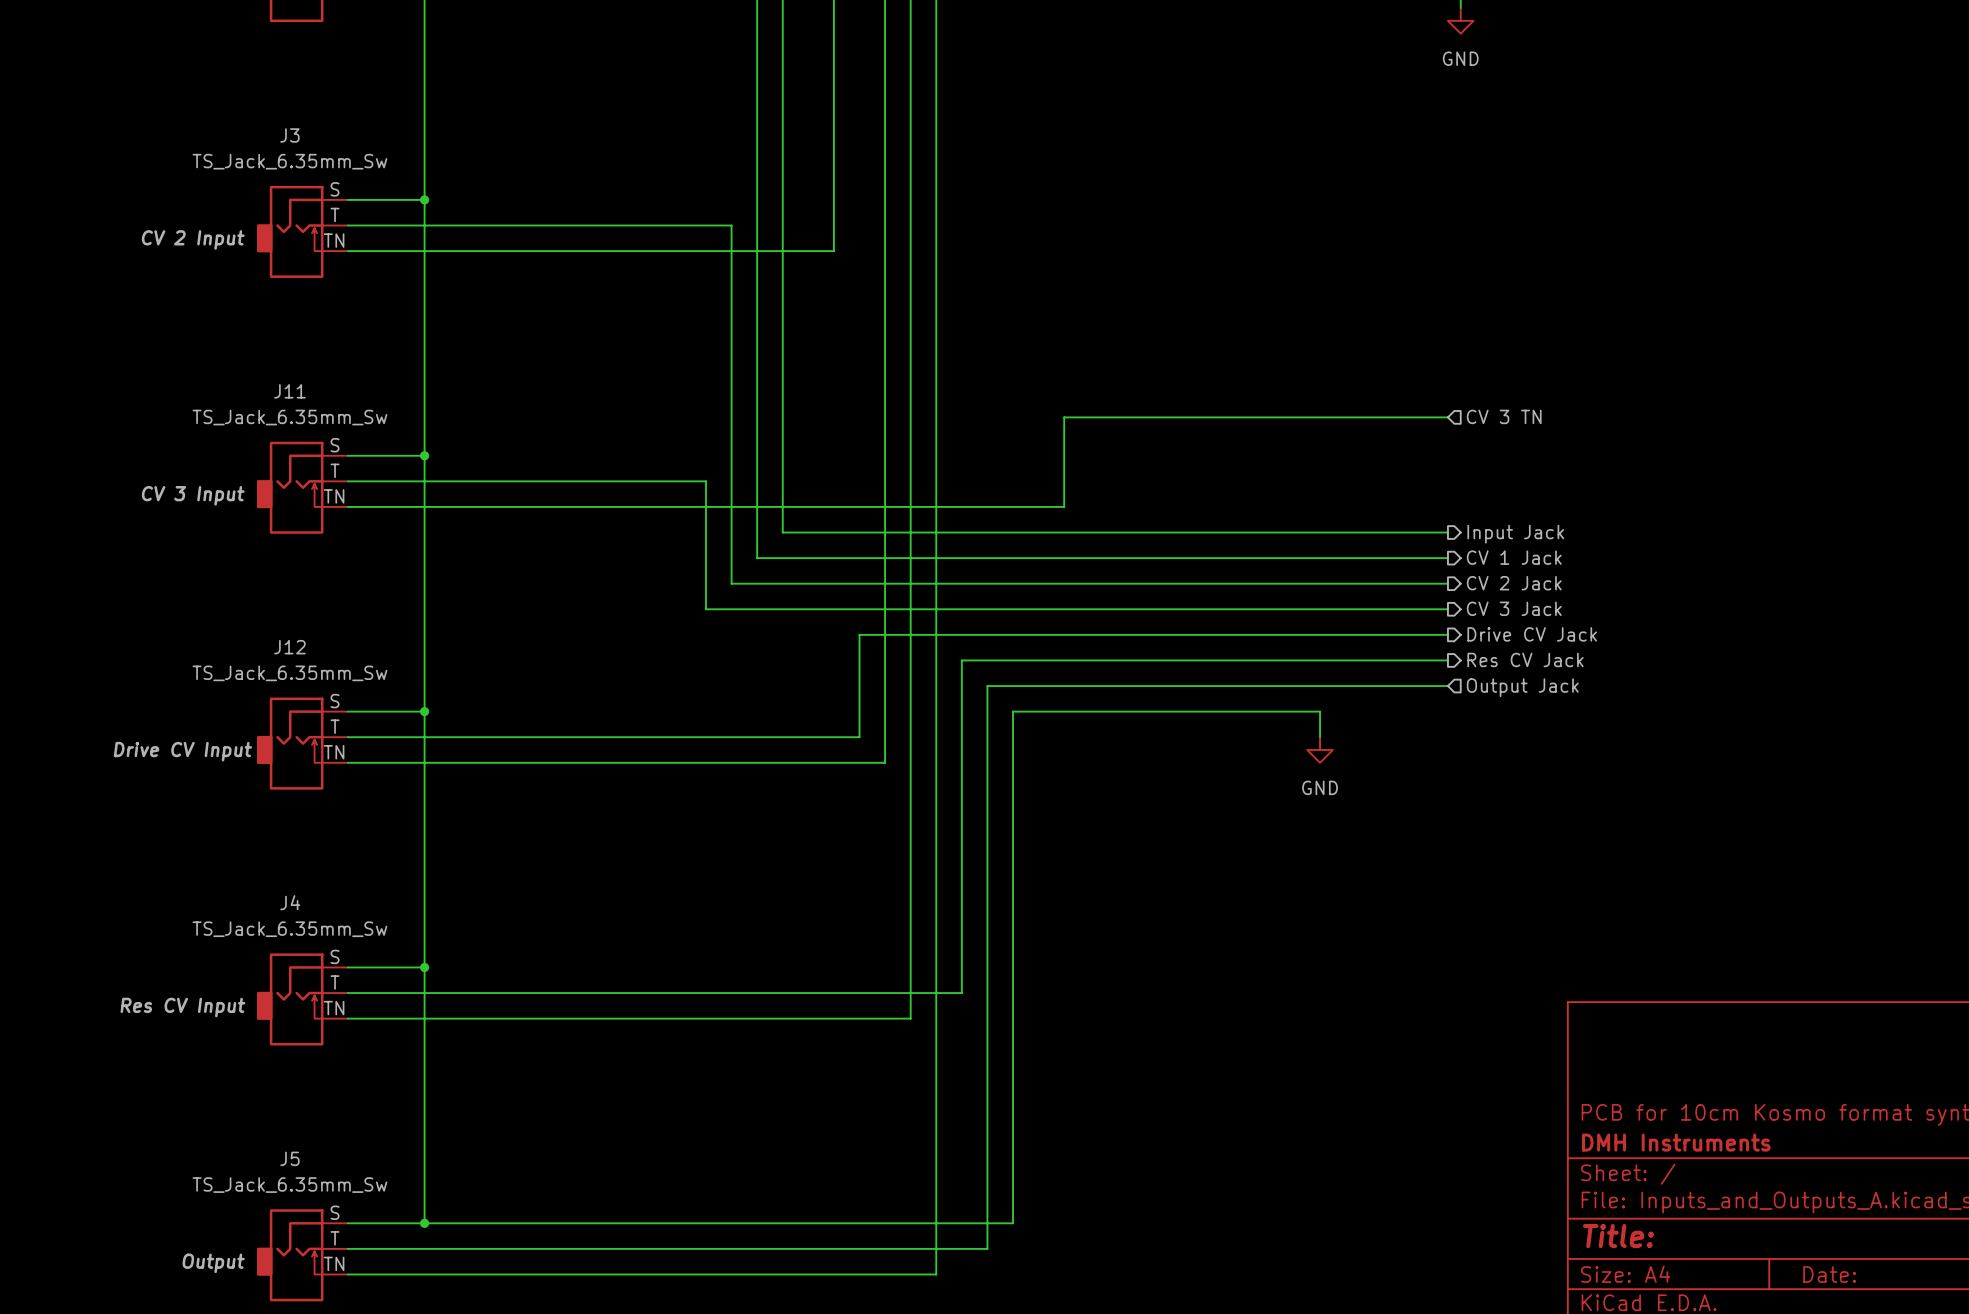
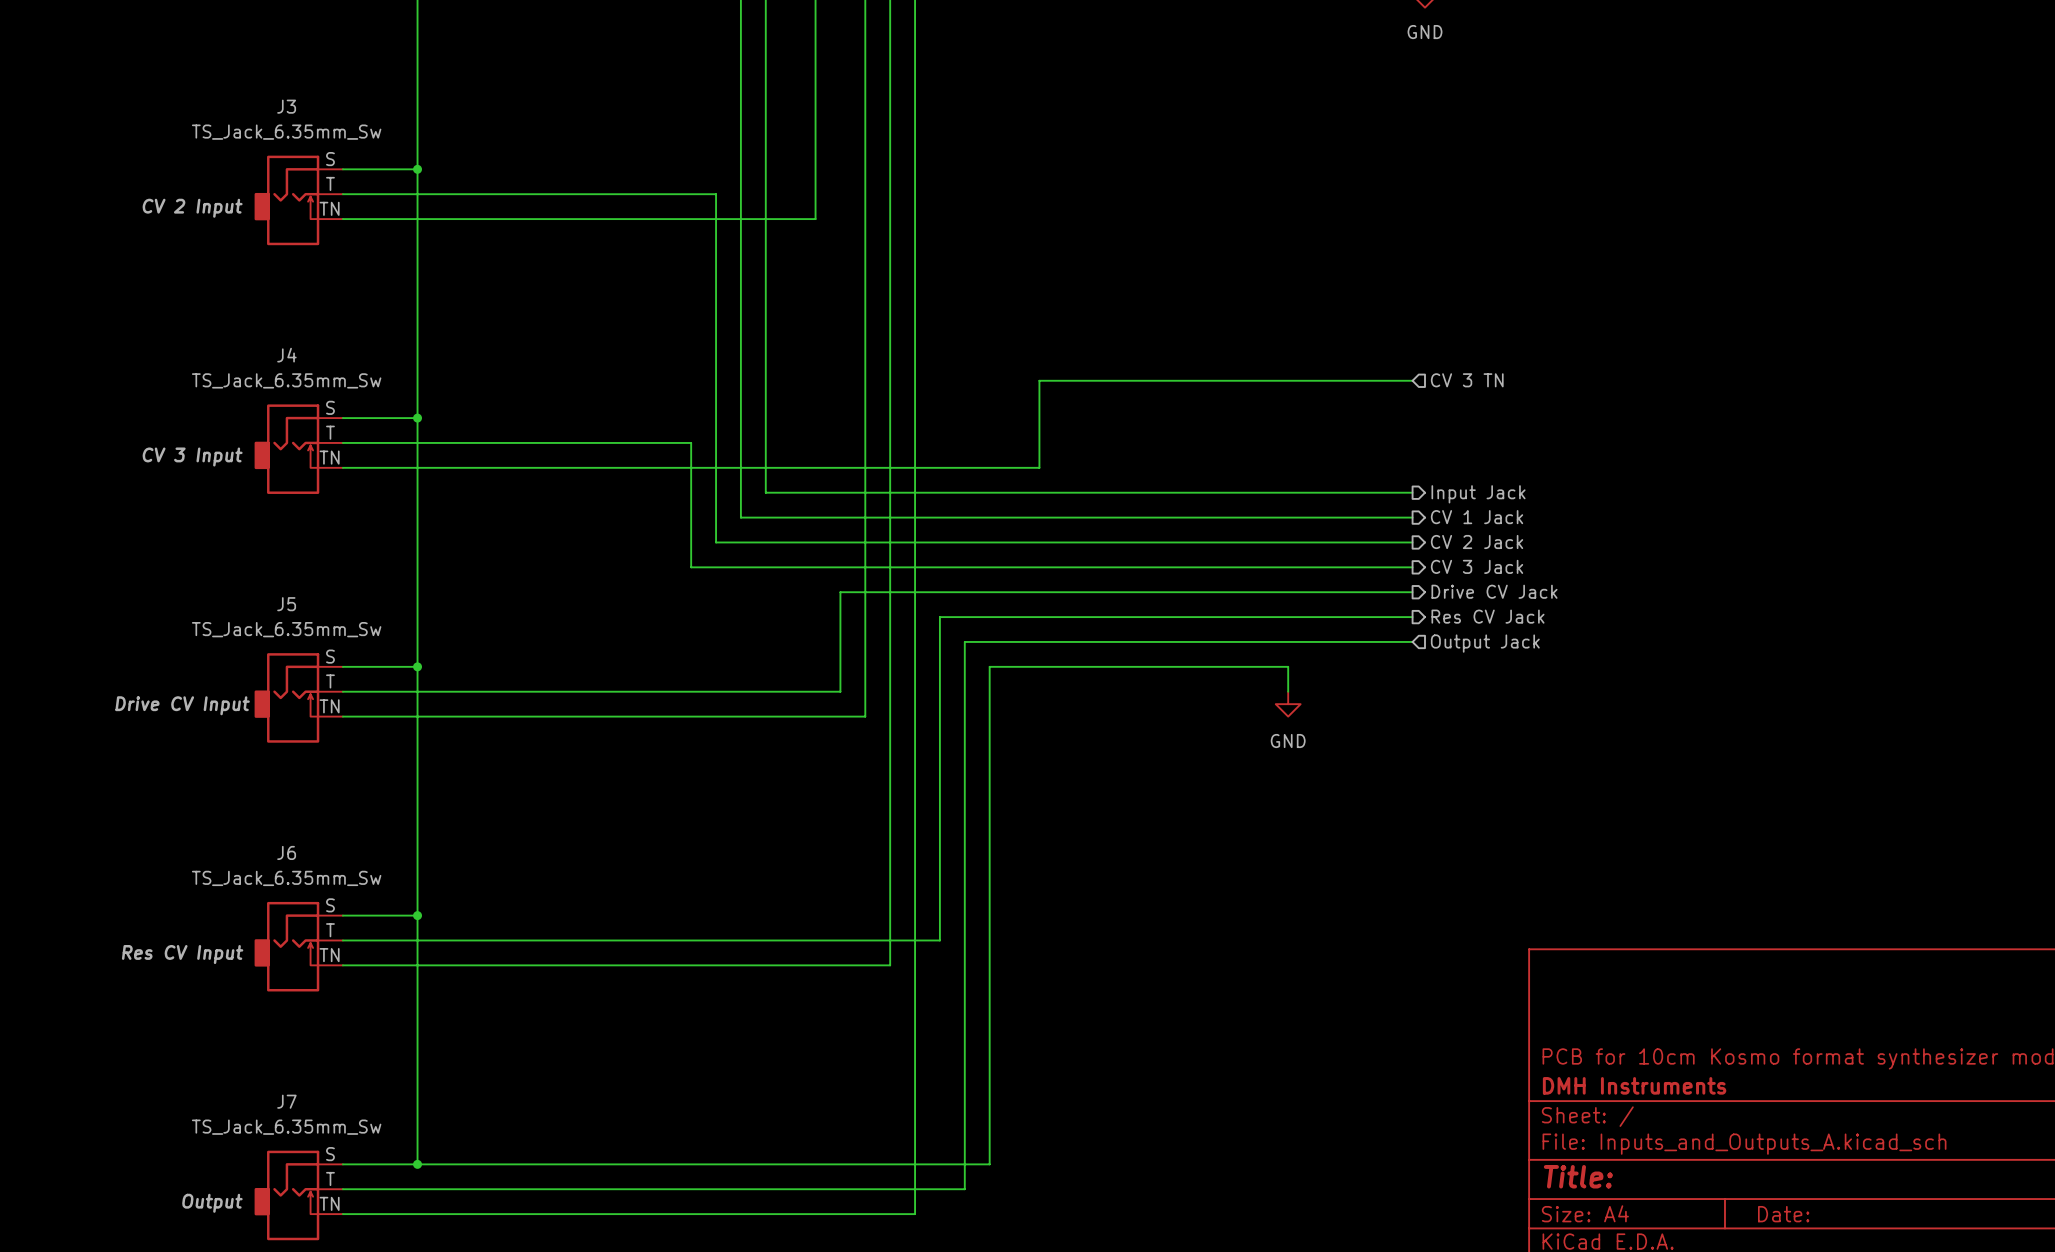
J11 name: J11 (289, 391) -> J4 (286, 355)
J12 name: J12 (289, 647) -> J5 (286, 604)
J4 name: J4 (290, 902) -> J6 (286, 852)
J5 name: J5 (289, 1158) -> J7 (286, 1101)

